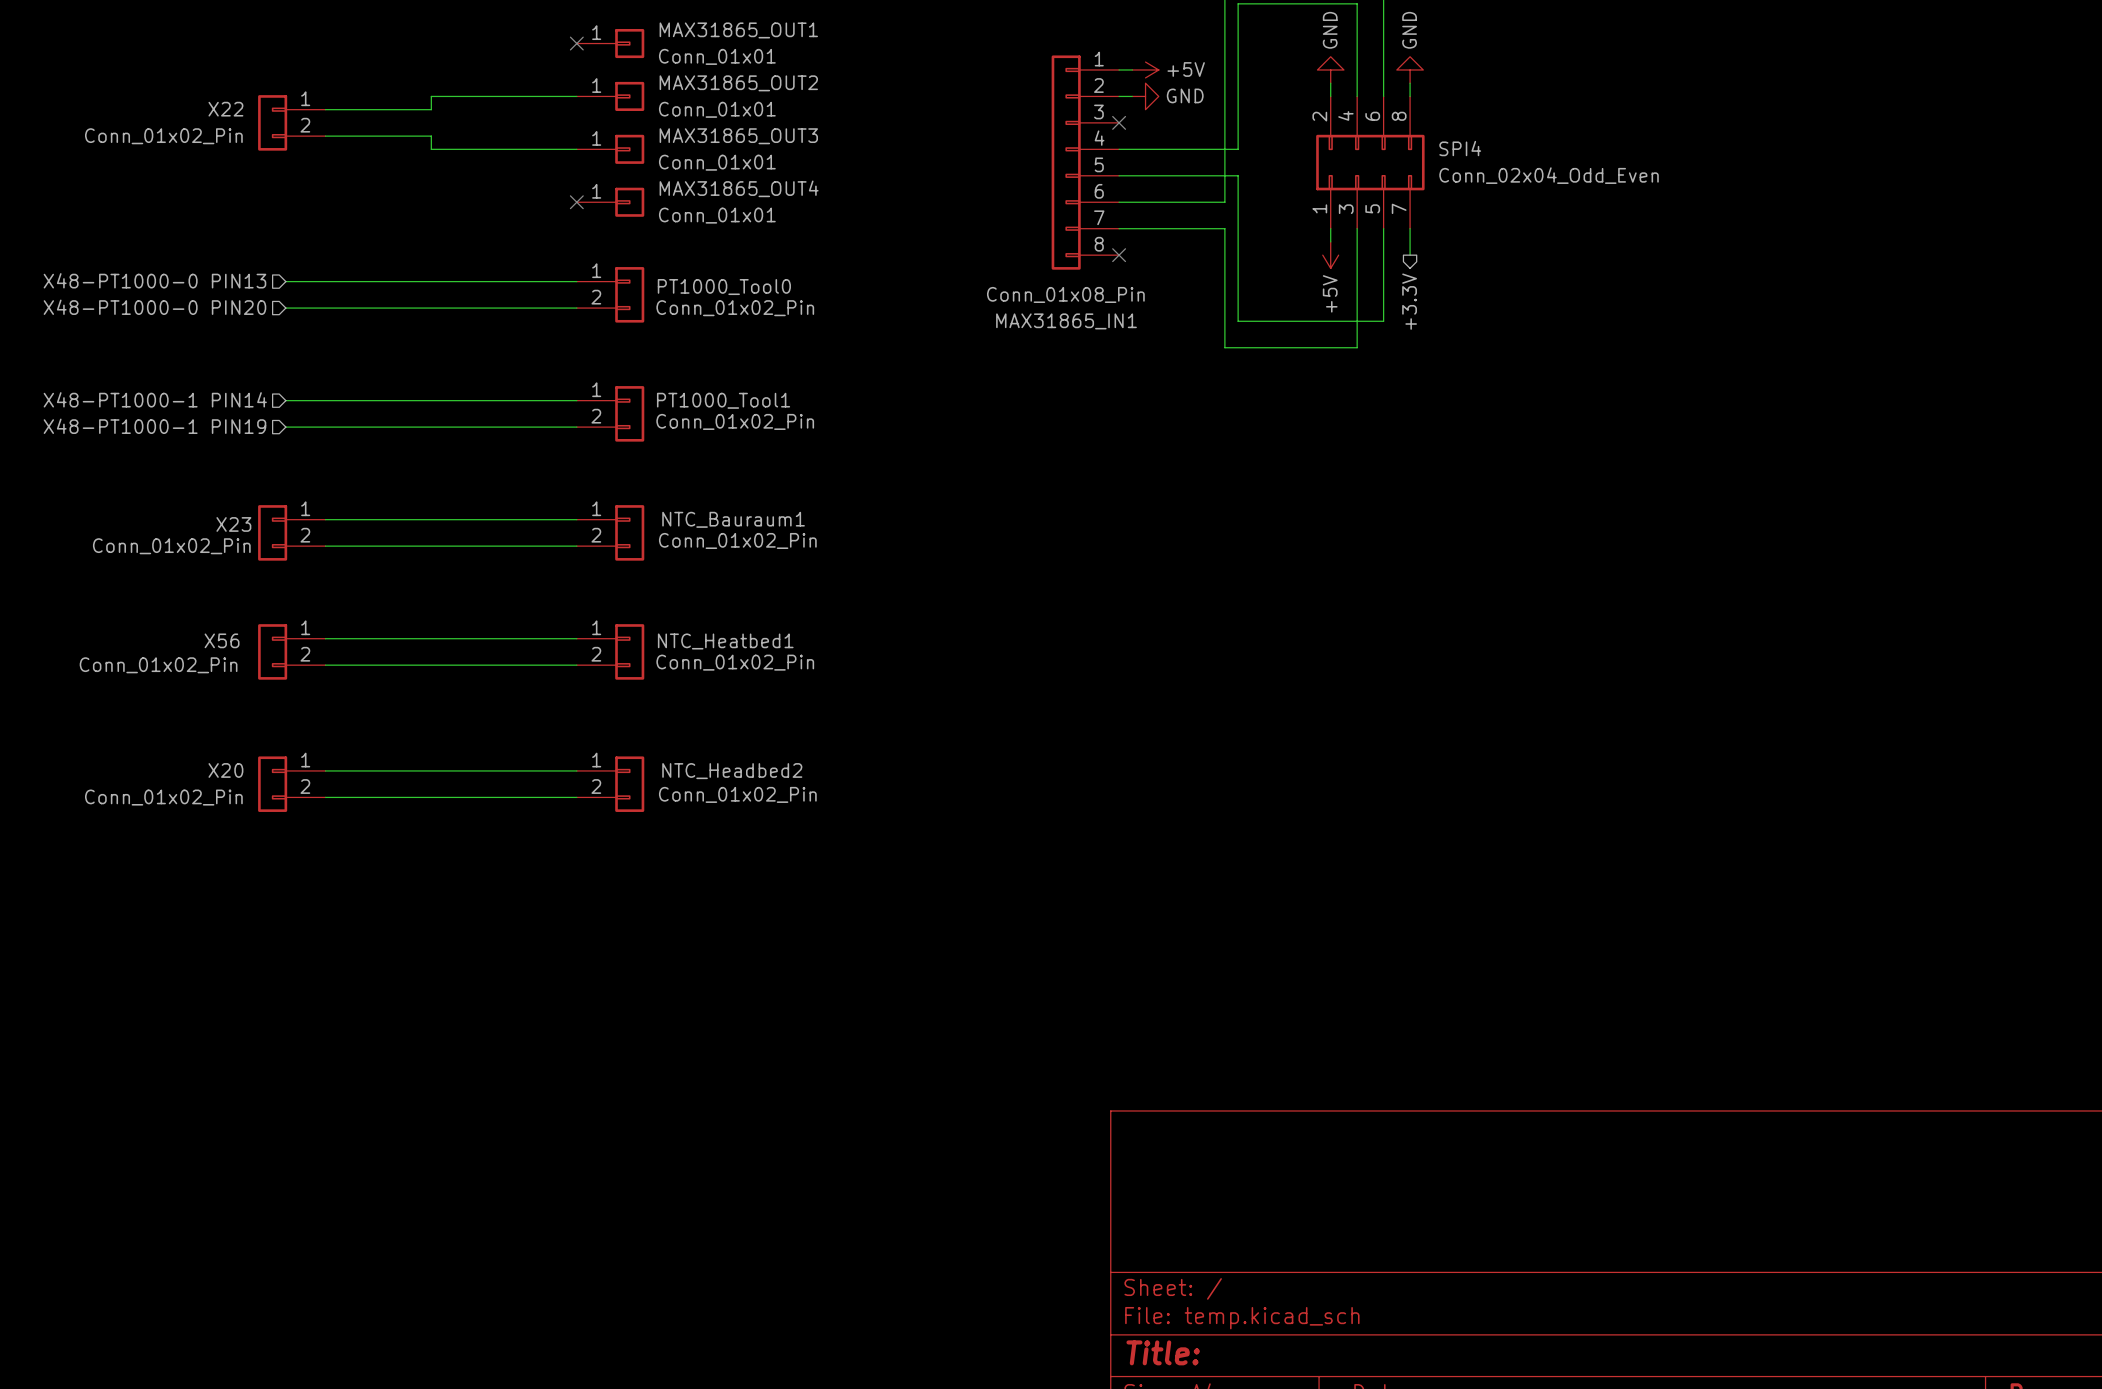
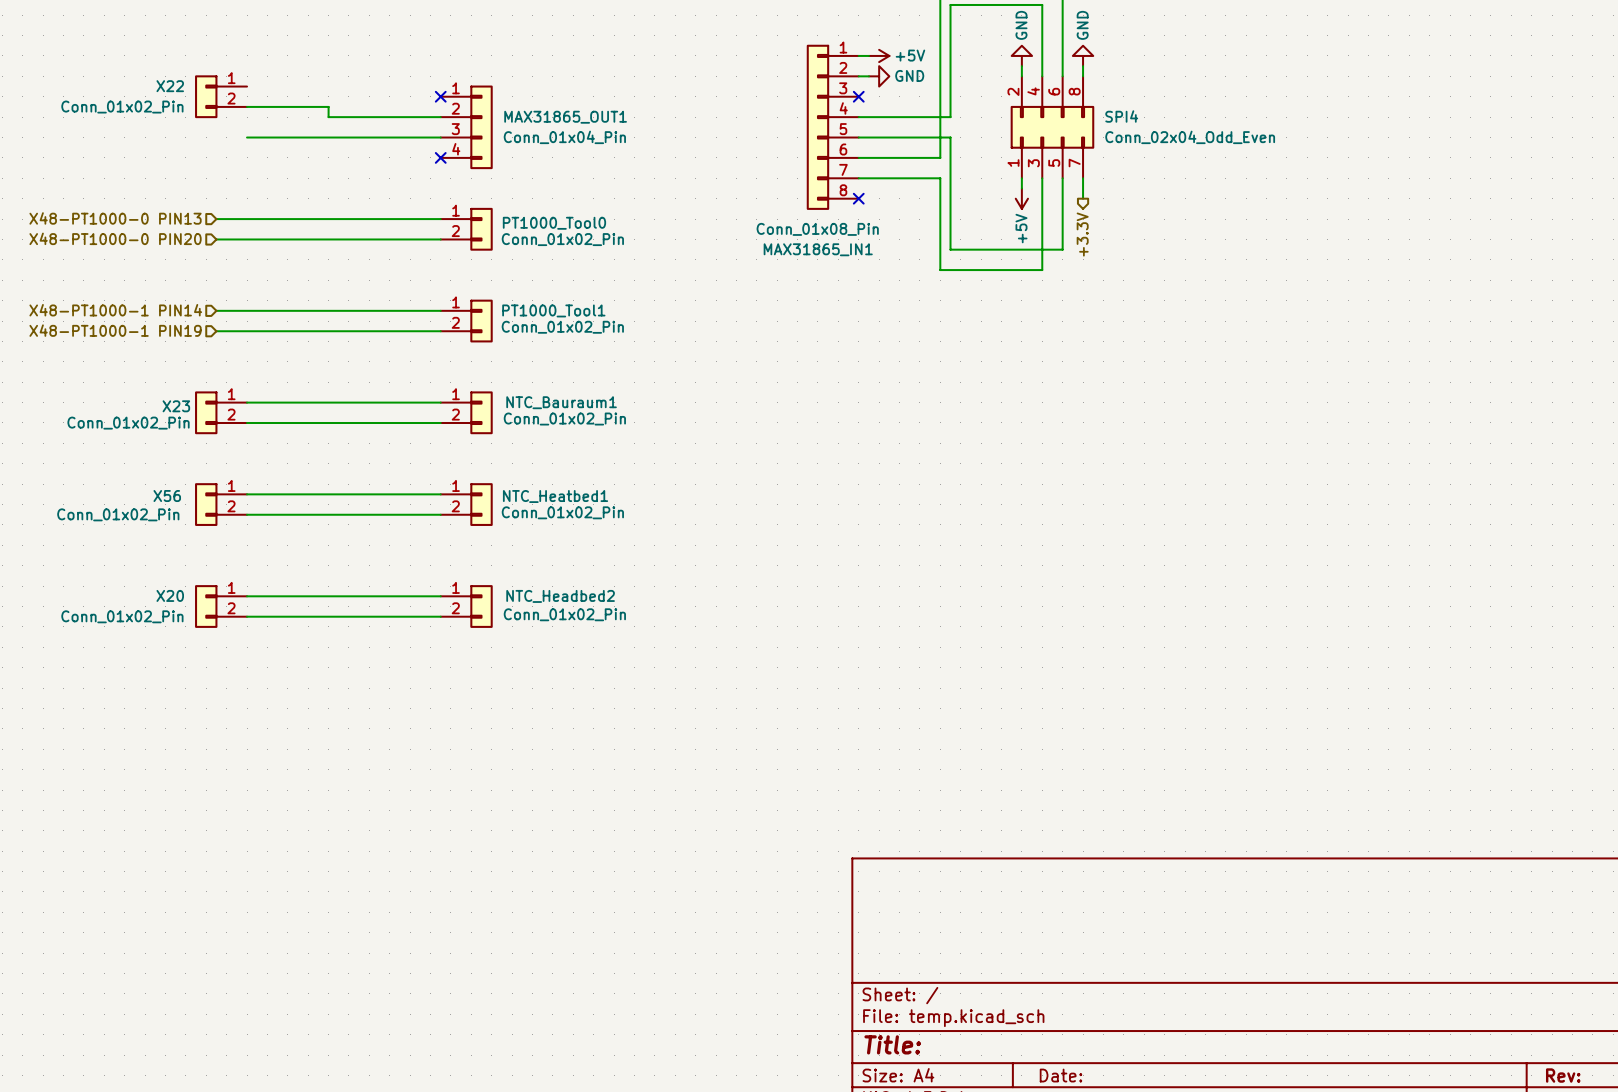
MAX31865_OUT1 symbol: [576, 28, 645, 59] -> [440, 85, 493, 170]
no-connect mark: (576, 43) -> none
MAX31865_OUT1 value: Conn_01x01 (717, 56) -> Conn_01x04_Pin (564, 137)
wire: (576, 96) (431, 96) (431, 109) (325, 109) -> none
MAX31865_OUT2: Conn_01x01 (610, 96) -> none
no-connect mark: none -> (440, 96)
MAX31865_OUT3: Conn_01x01 (610, 149) -> none
wire: none -> (247, 137) (440, 137)
MAX31865_OUT4: Conn_01x01 (610, 202) -> none

